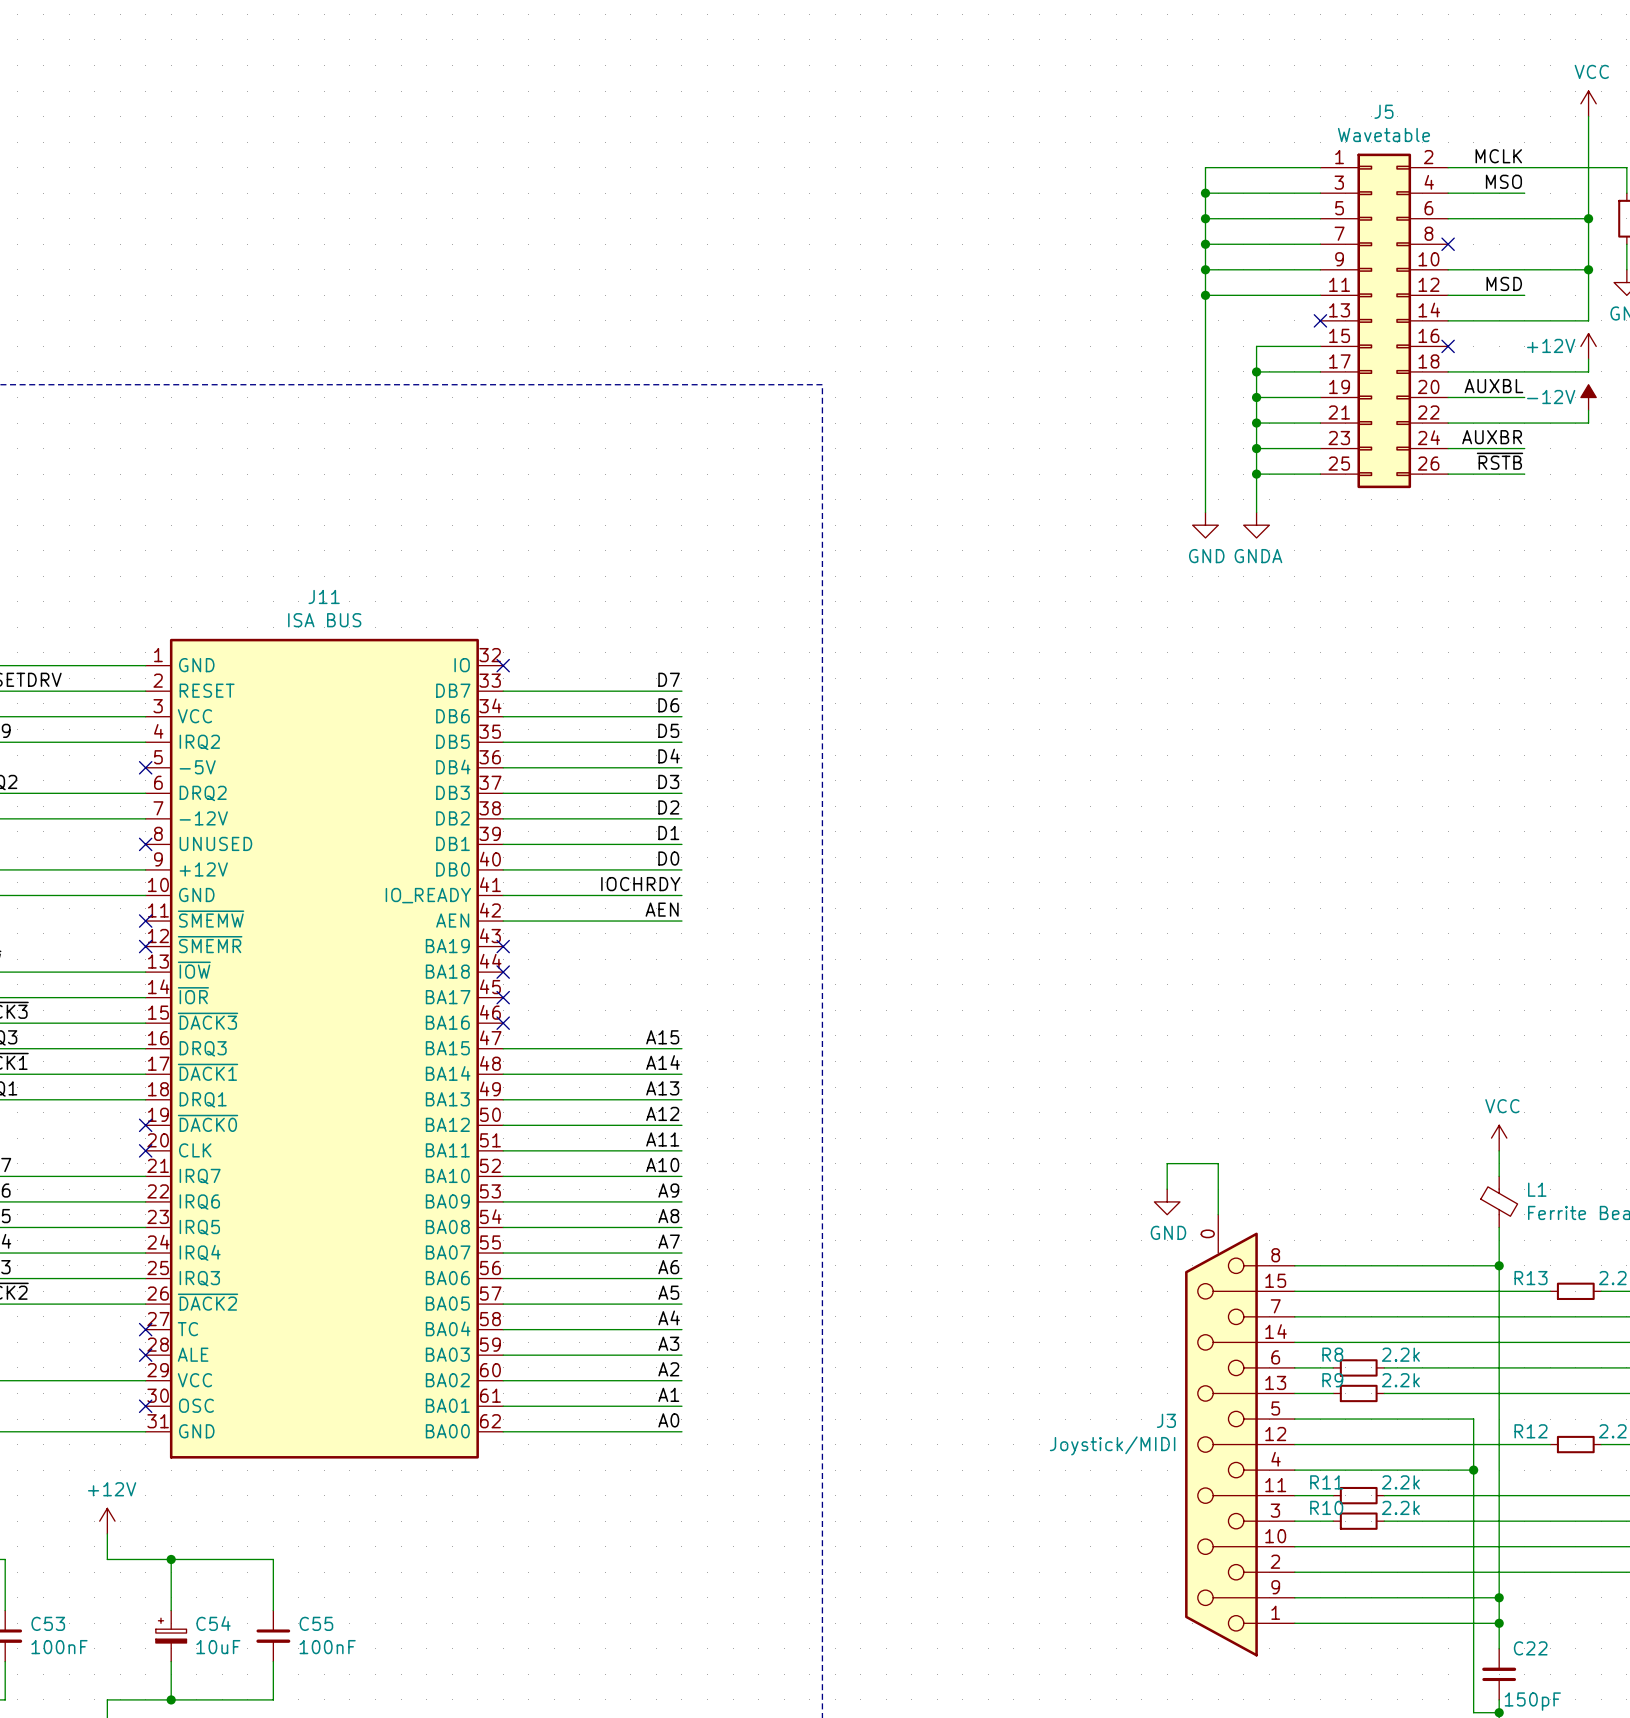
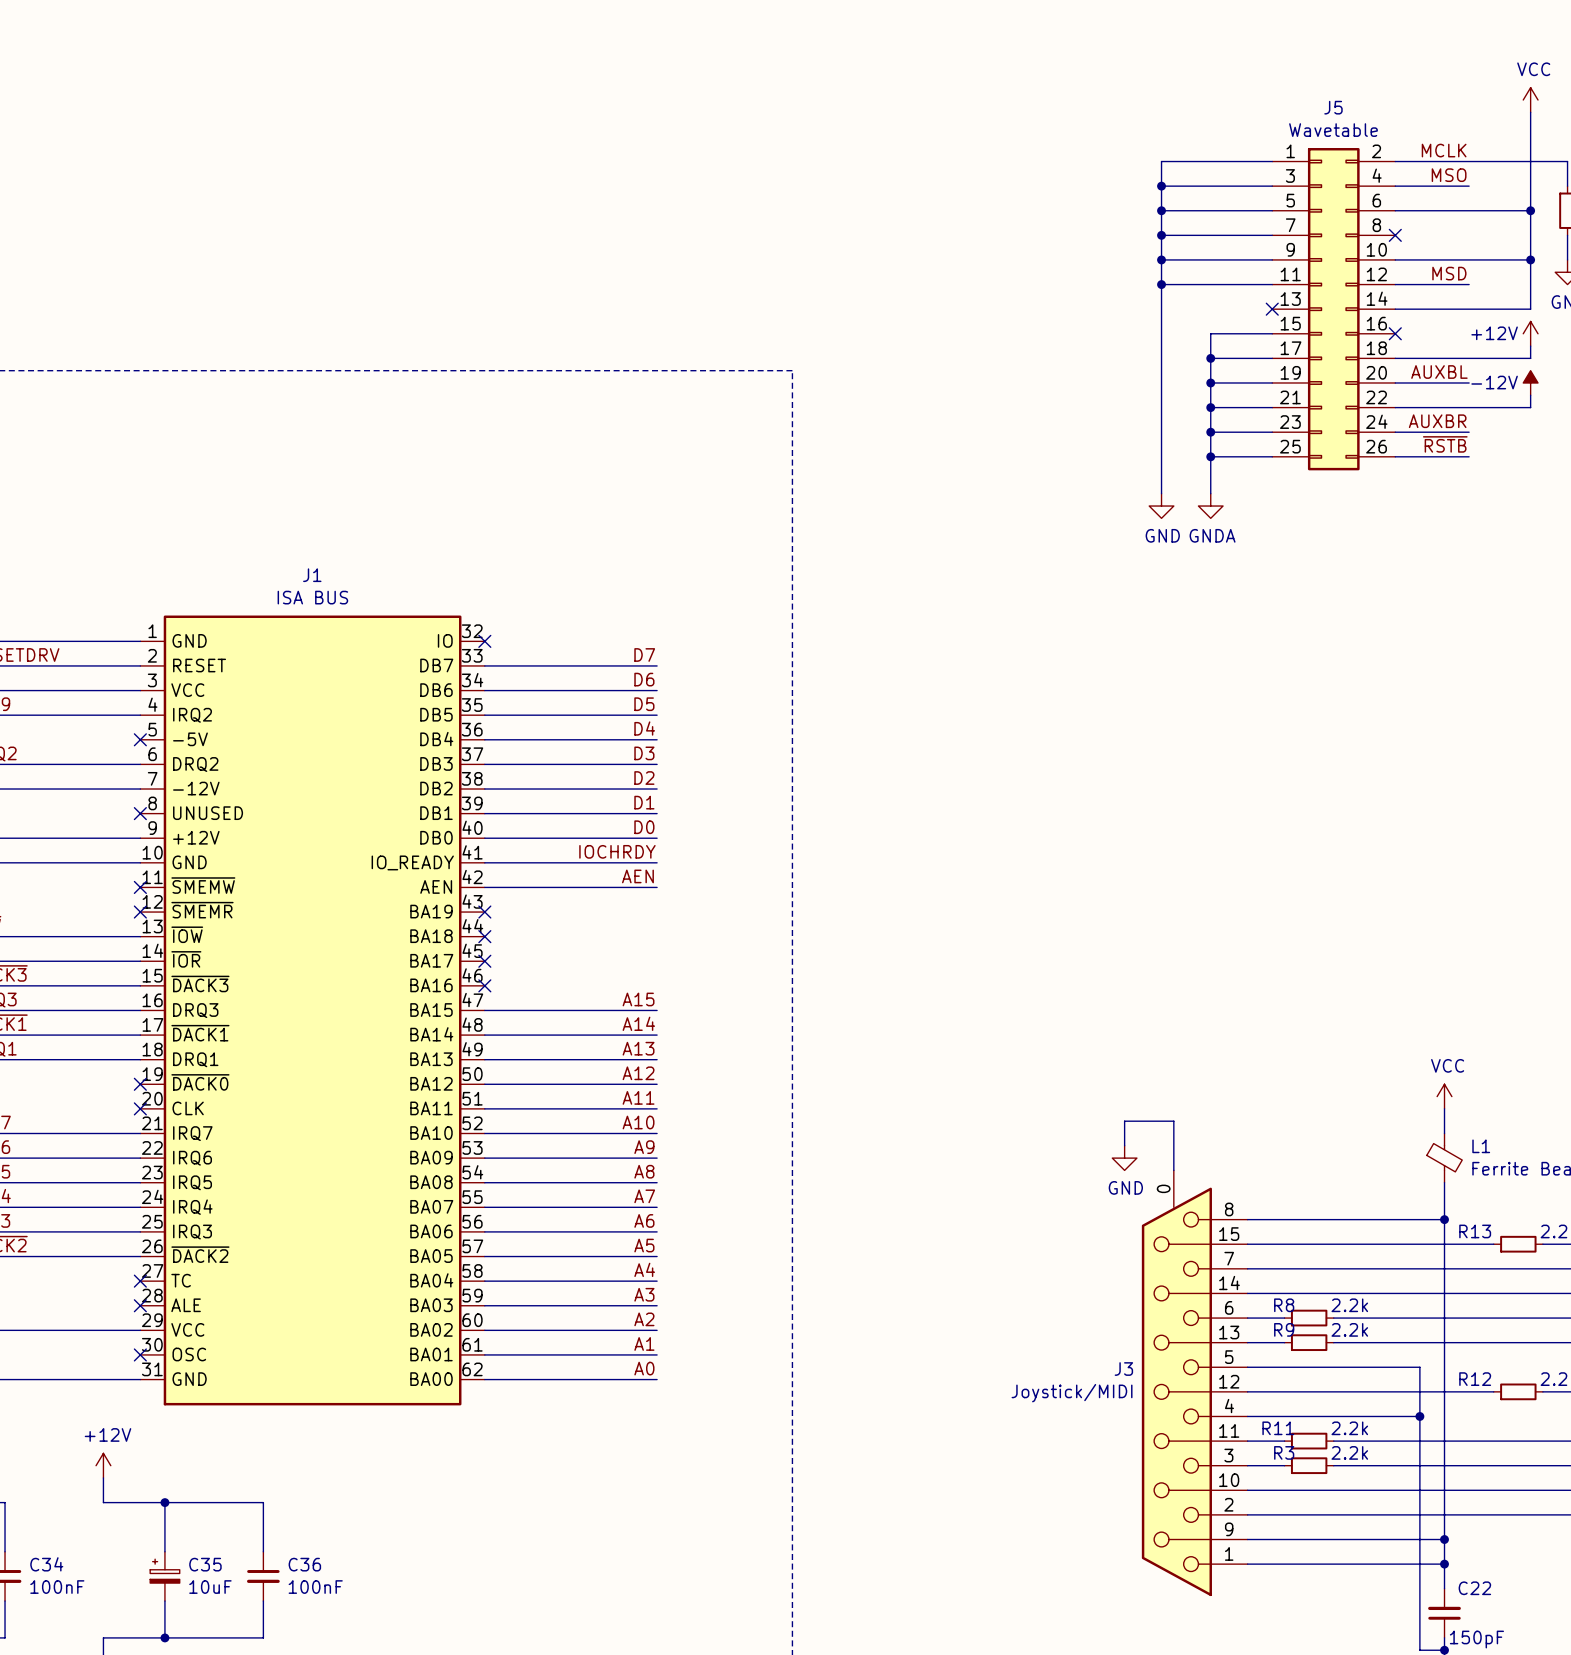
J11 name: J11 (324, 596) -> J1 (312, 575)
R10 name: R10 (1326, 1507) -> R3 (1284, 1452)
C53 name: C53 (48, 1623) -> C34 (46, 1564)
C54 name: C54 (213, 1623) -> C35 (205, 1564)
C55 name: C55 (316, 1623) -> C36 (304, 1564)

